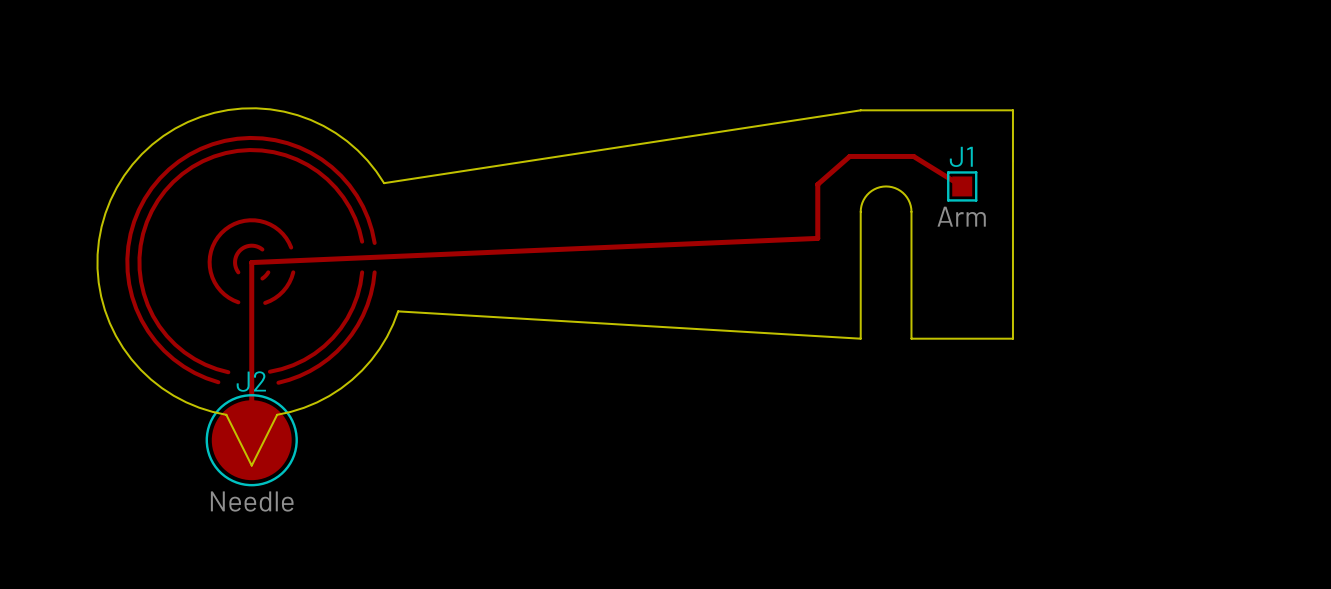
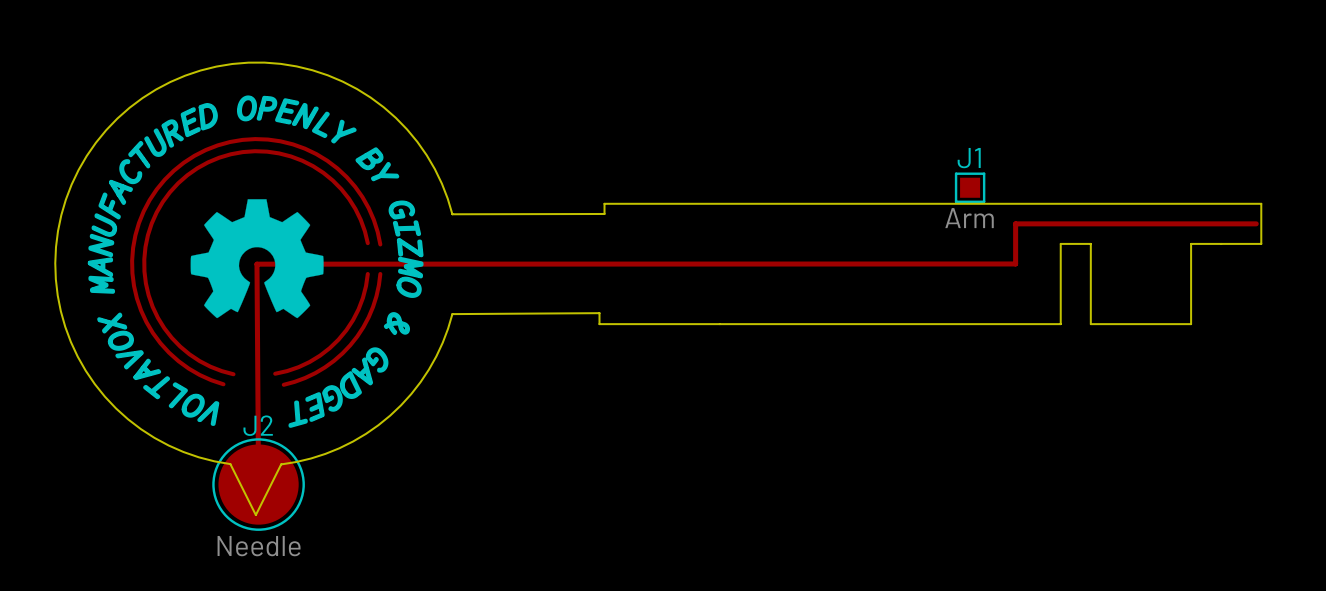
drawing: none -> [87, 95, 424, 428]
board edge: (860, 110) (384, 183) (367, 160) (347, 141) (310, 119) (270, 109) (242, 108) (214, 112) (187, 122) (163, 135) (142, 154) (124, 175) (110, 200) (98, 240) (97, 268) (101, 296) (115, 335) (140, 369) (161, 388) (186, 402) (226, 414) (251, 465) (277, 414) (316, 402) (352, 379) (379, 348) (398, 311) (860, 338) (860, 208) (867, 194) (874, 189) (883, 186) (892, 187) (900, 190) (906, 197) (910, 205) (911, 338) (1012, 338) (1012, 110) (860, 110) -> (281, 464) (255, 515) (230, 464) (198, 457) (168, 445) (140, 429) (116, 408) (85, 370) (70, 342) (60, 311) (55, 279) (58, 231) (65, 199) (78, 169) (95, 142) (129, 107) (156, 89) (200, 70) (232, 63) (280, 63) (312, 70) (357, 89) (383, 107) (417, 141) (441, 183) (452, 214) (604, 213) (604, 203) (1261, 203) (1261, 243) (1191, 243) (1191, 324) (1090, 324) (1090, 243) (1060, 243) (1060, 324) (599, 324) (599, 313) (452, 314) (442, 342) (428, 369) (411, 394) (390, 415) (365, 433) (339, 448) (311, 458) (281, 464)
track: (962, 186) (913, 156) (849, 156) (817, 184) (817, 238) (251, 262) (251, 440) -> none
drawing: none -> [190, 199, 324, 319]
track: none -> (1256, 223) (1015, 223) (1015, 263) (256, 264) (258, 484)
track: (291, 247) (279, 230) (260, 221) (239, 222) (221, 233) (211, 251) (210, 272) (220, 290) (238, 302) -> none
track: (262, 249) (251, 245) (240, 250) (235, 260) (238, 272) -> none
track: (268, 272) (262, 278) -> none
track: (293, 272) (283, 291) (265, 302) -> none
J2 position: (251, 440) -> (258, 484)

